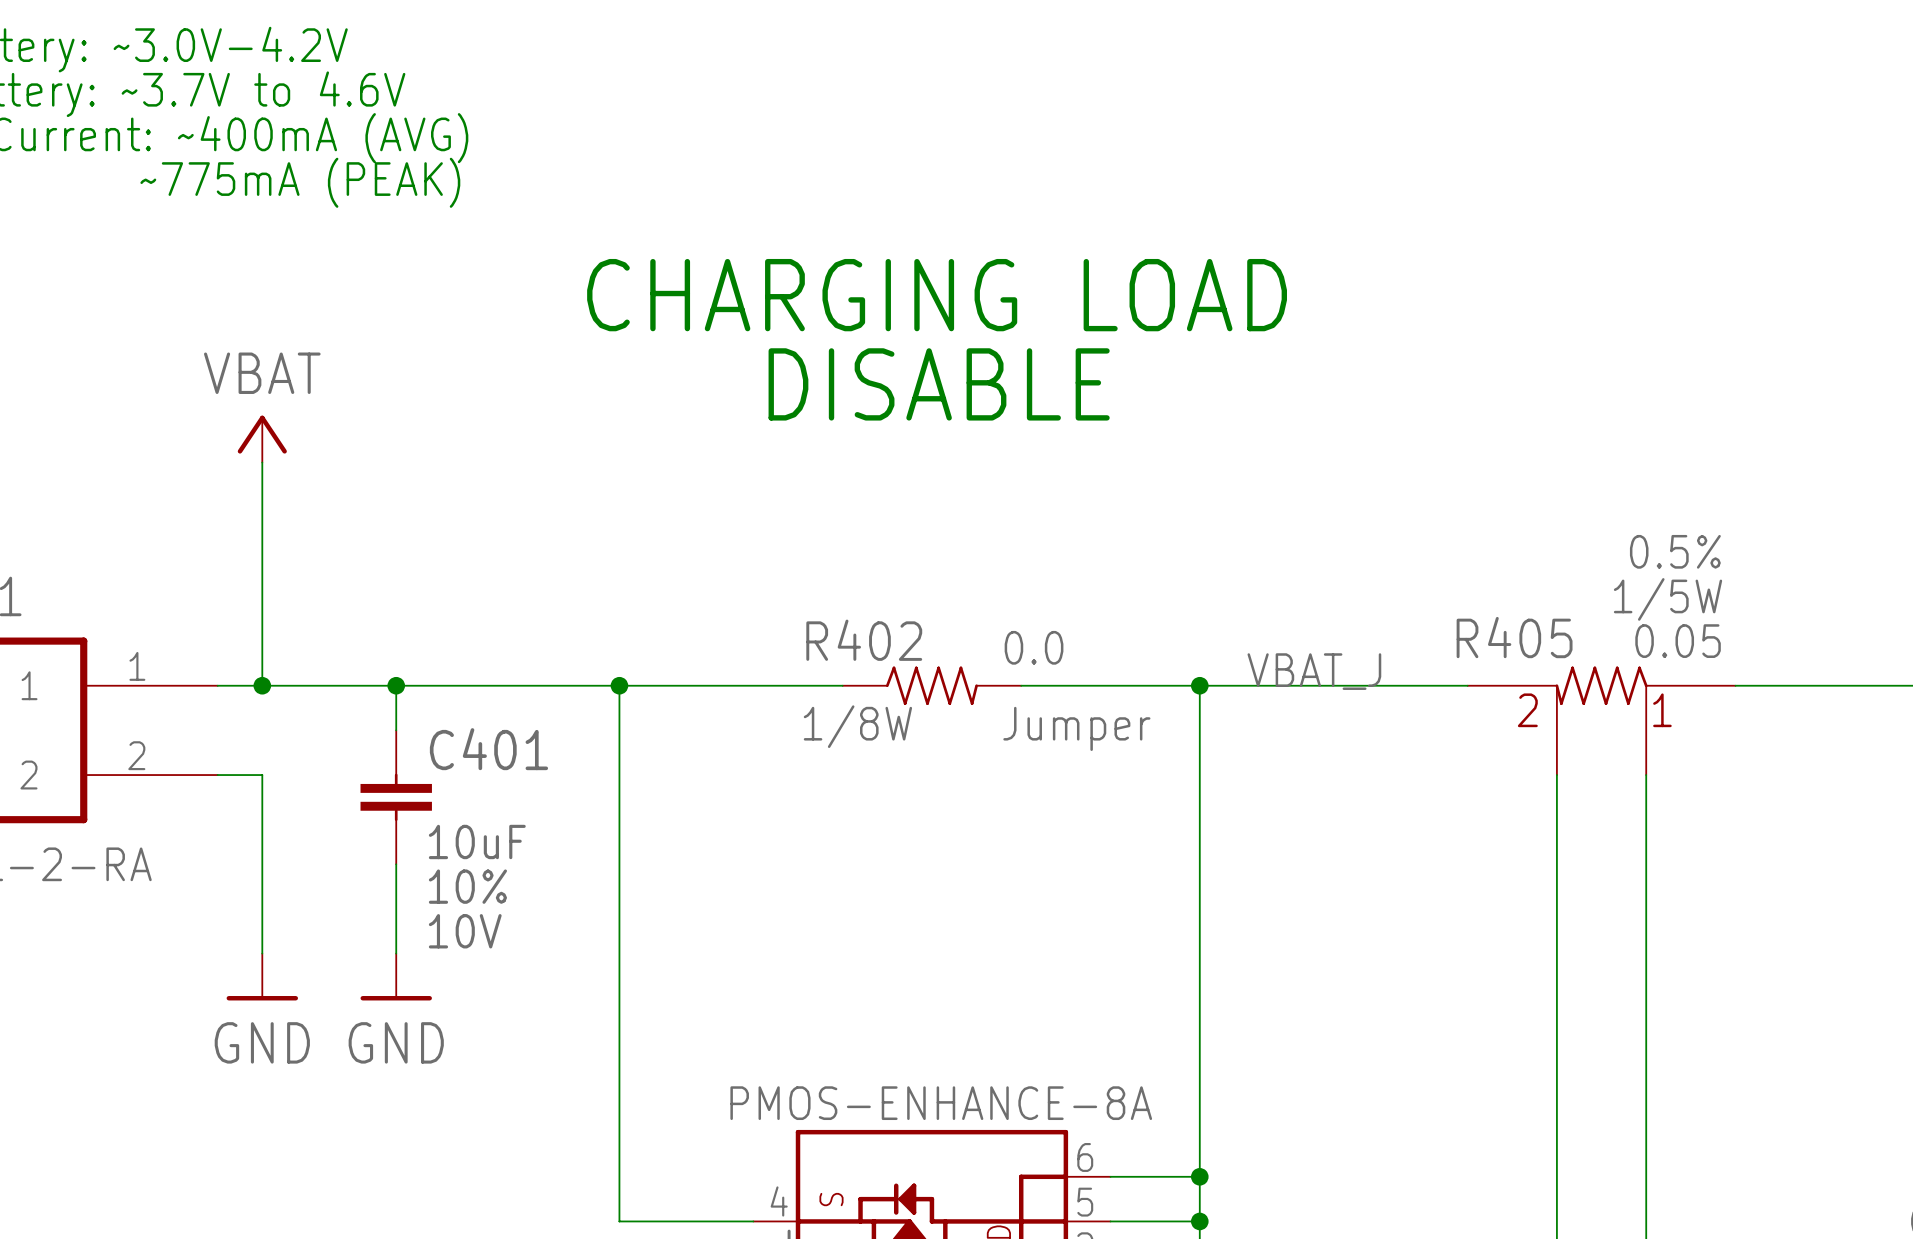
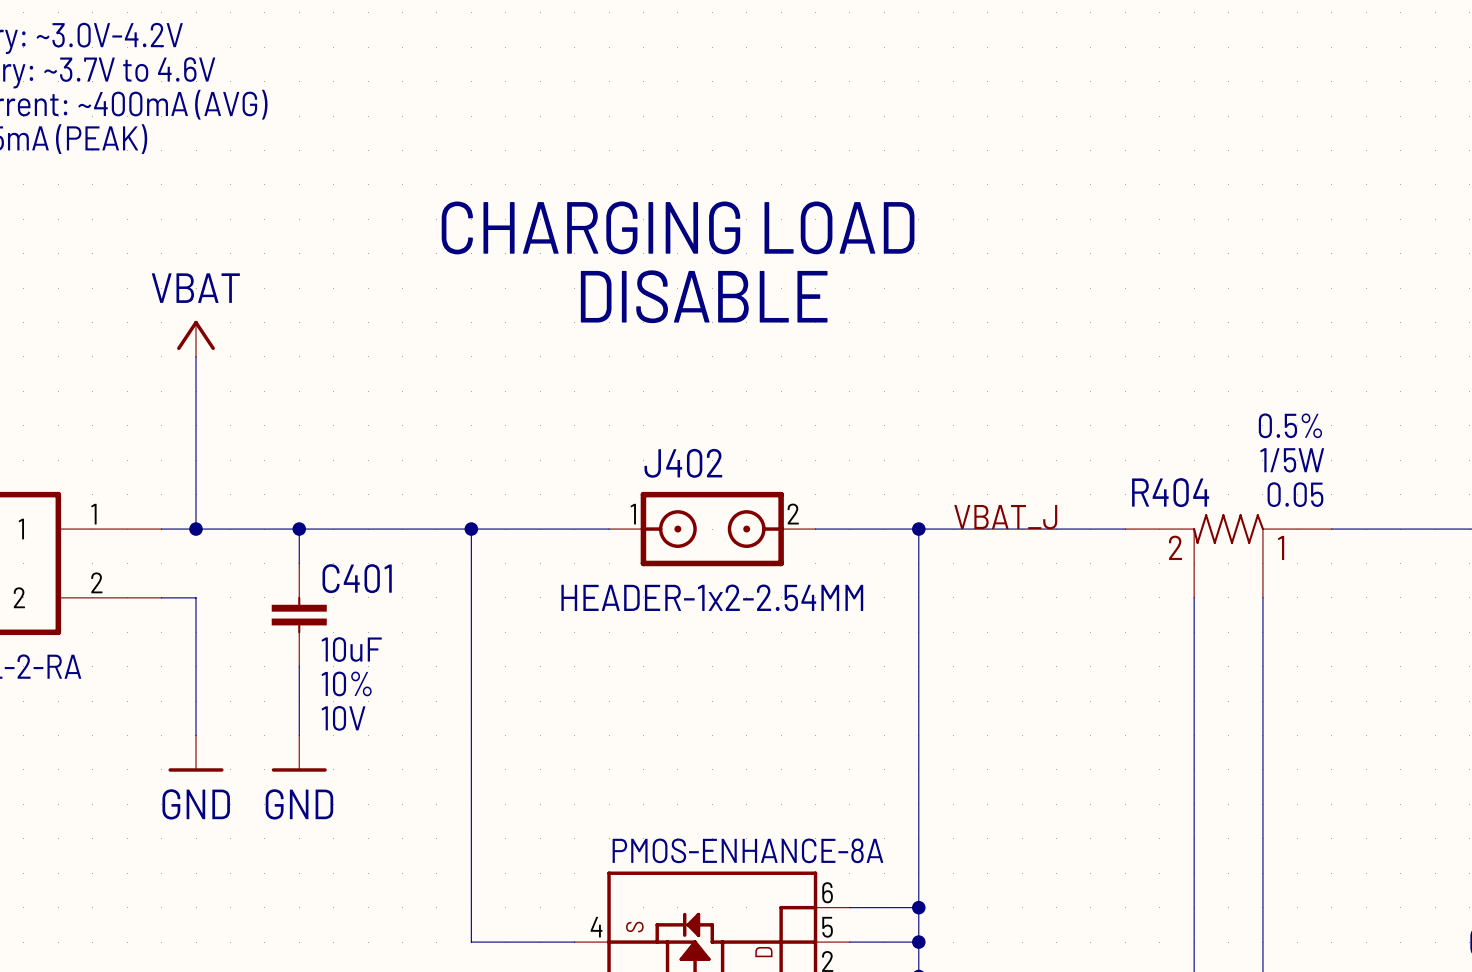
R405 name: R405 (1514, 637) -> R404 (1170, 492)
R402: 0.0 (931, 685) -> none
J402: none -> HEADER-1x2-2.54MM (712, 529)

